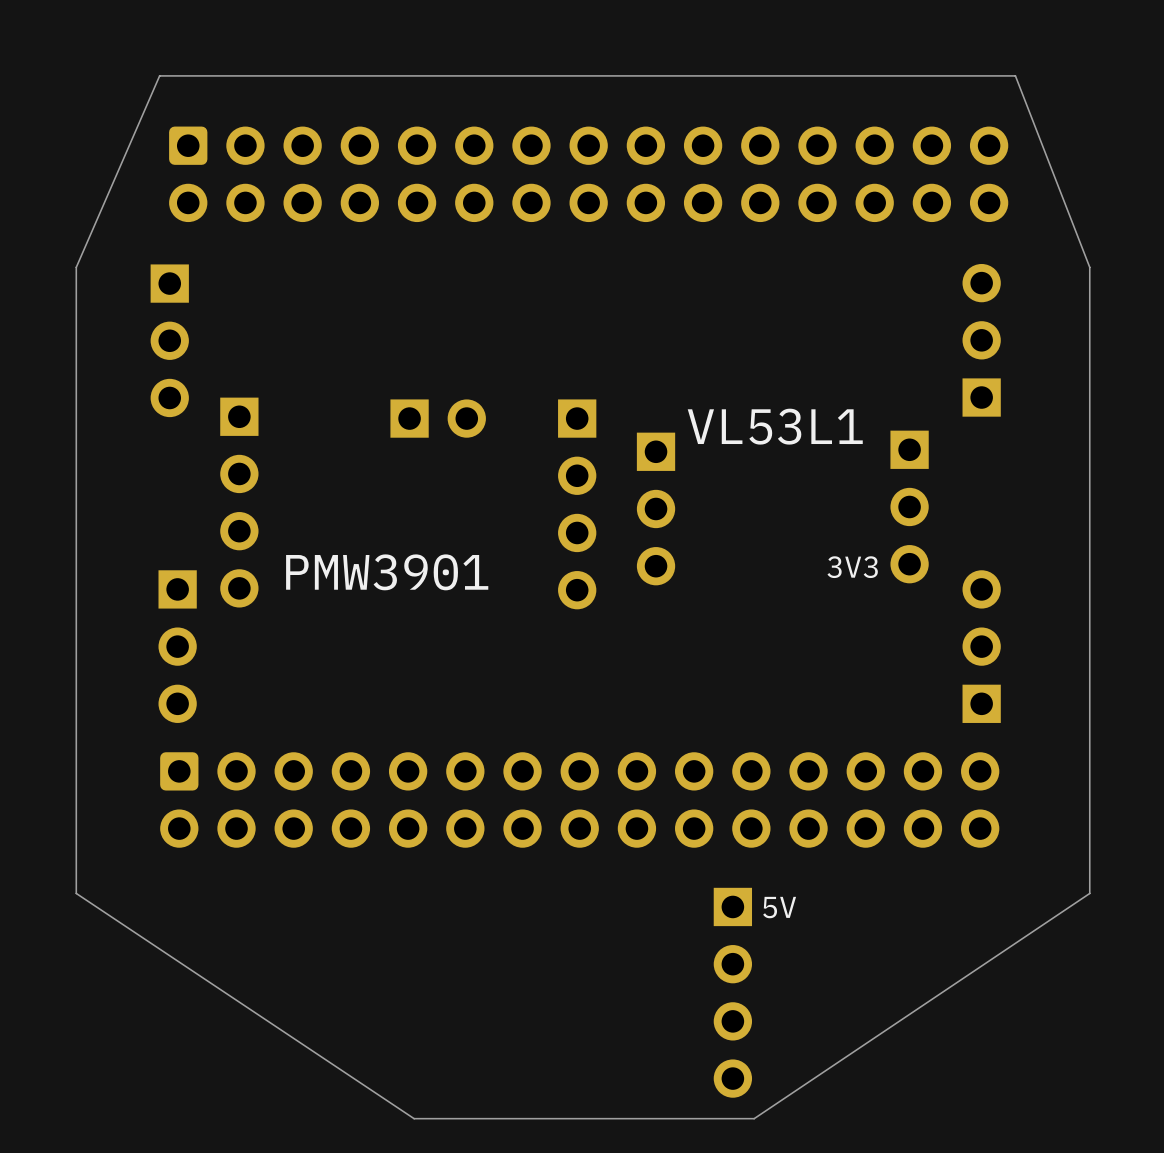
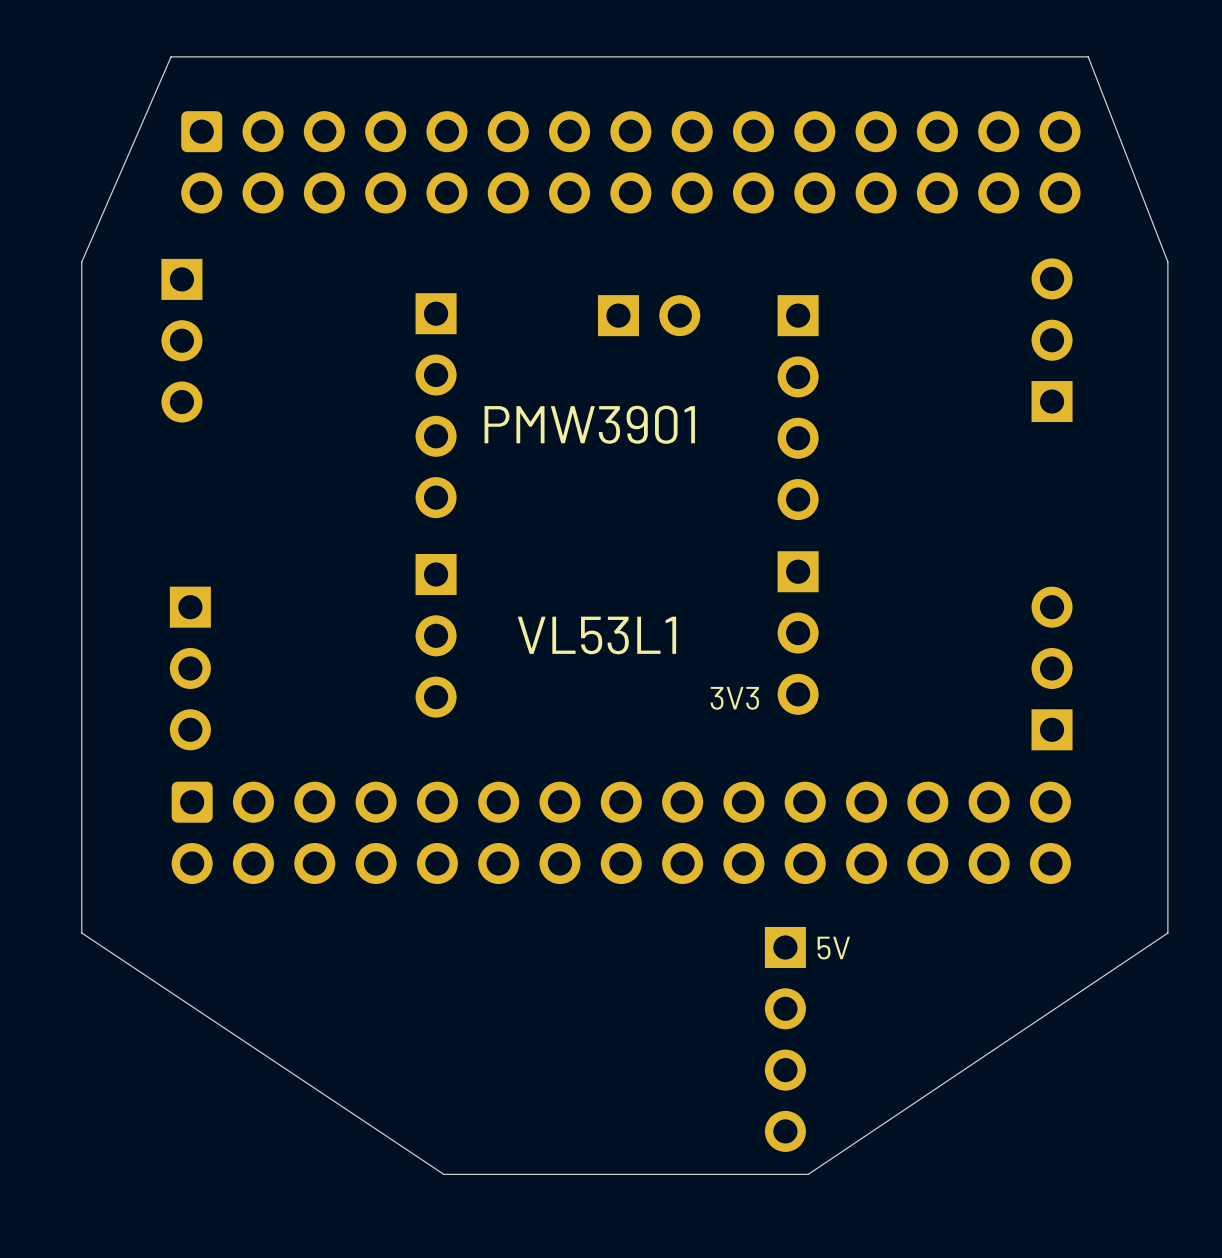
part: none -> (436, 405)
part: none -> (798, 407)
part position: (438, 418) -> (649, 315)
text position: VL53L1 (775, 426) -> VL53L1 (597, 635)
part: (239, 502) -> none
part: (577, 504) -> none
part: (909, 506) -> none
part: (656, 508) -> none
text position: 3V3 (852, 567) -> 3V3 (734, 698)
text position: PMW3901 (387, 572) -> PMW3901 (589, 424)
part: none -> (798, 633)
part: none -> (436, 635)

